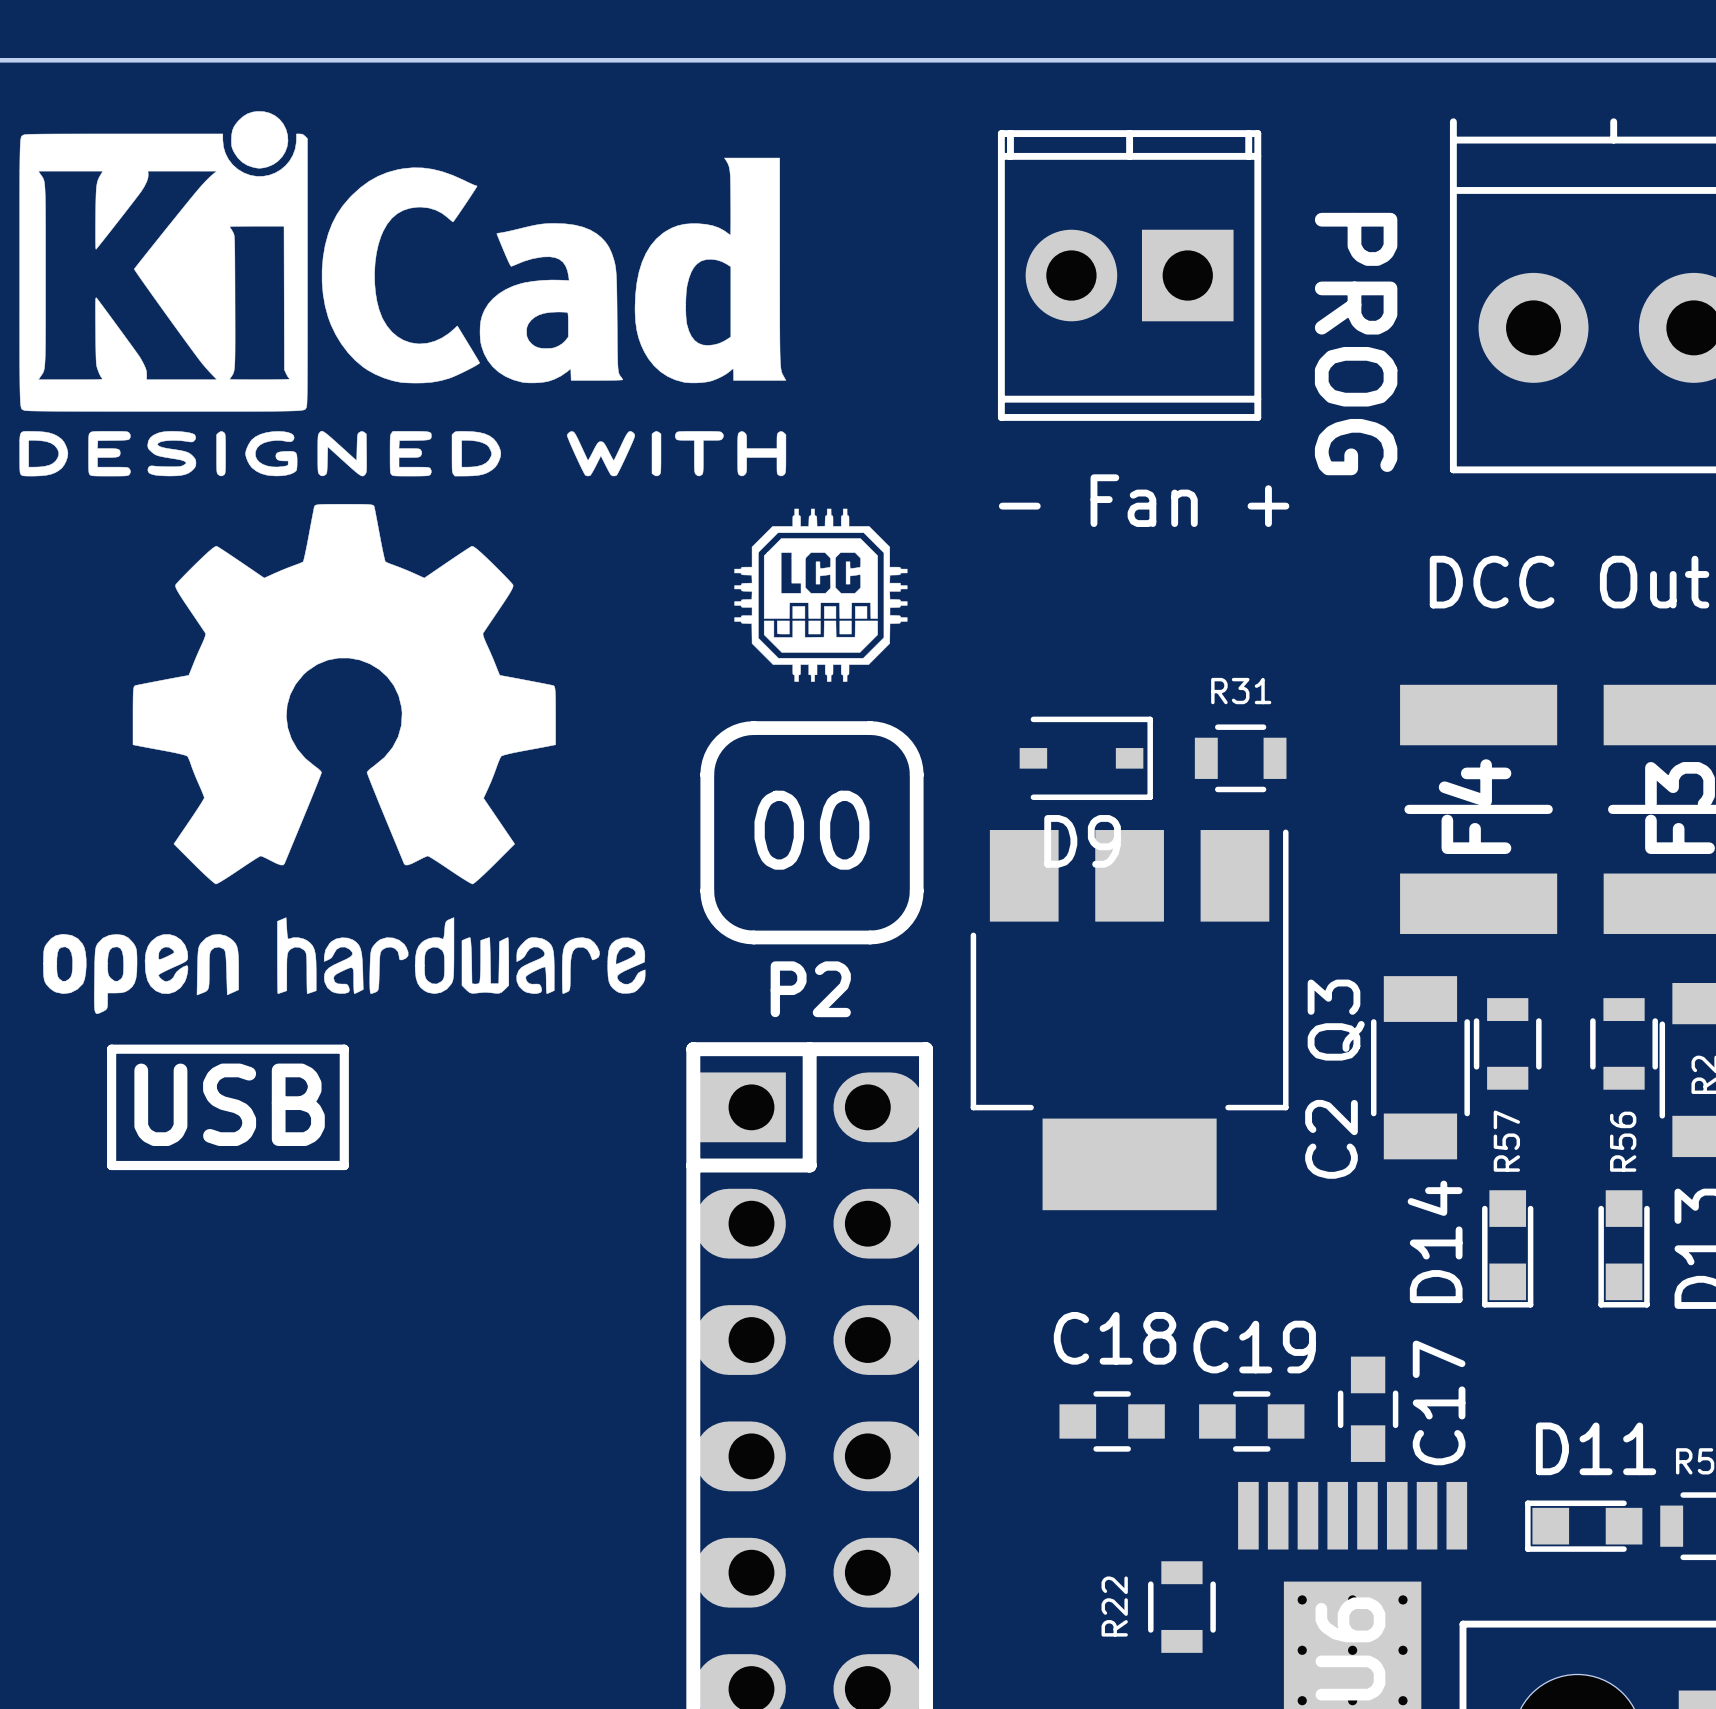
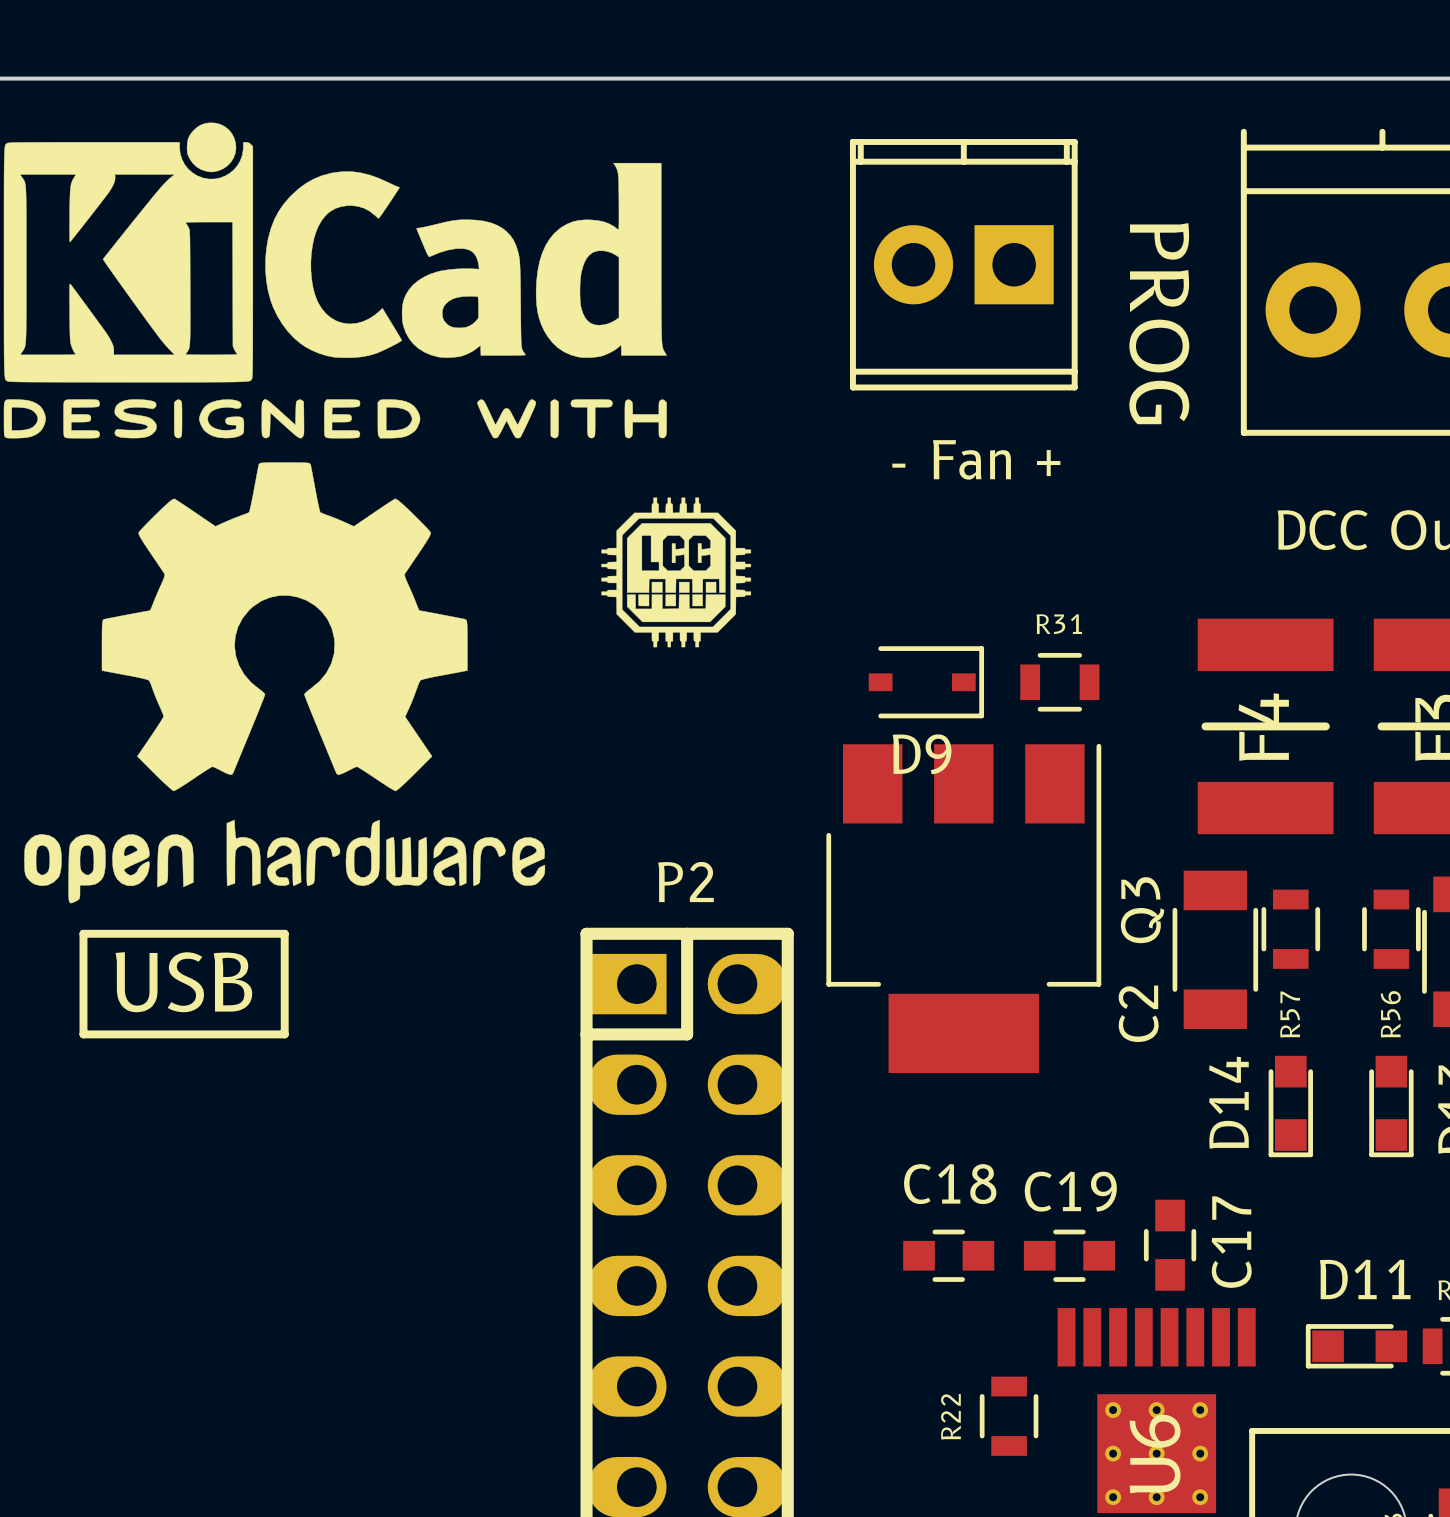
drawing position: (820, 595) -> (676, 572)
drawing: [700, 721, 924, 945] -> none

